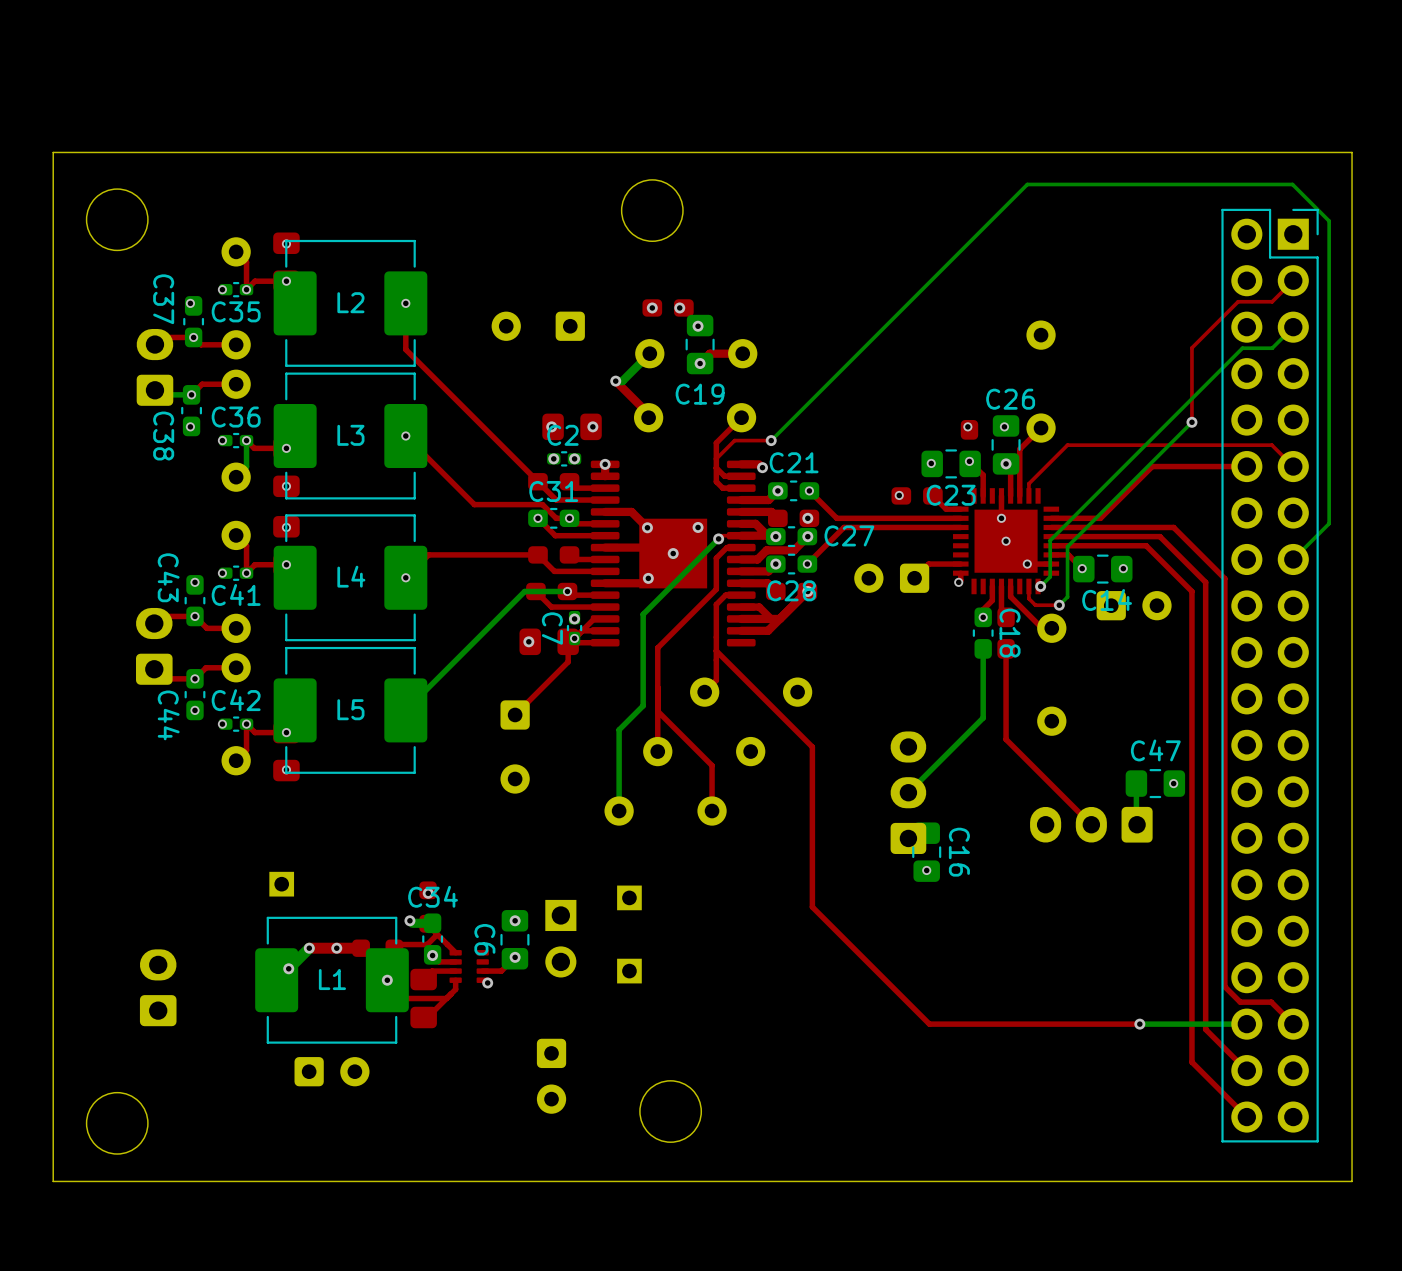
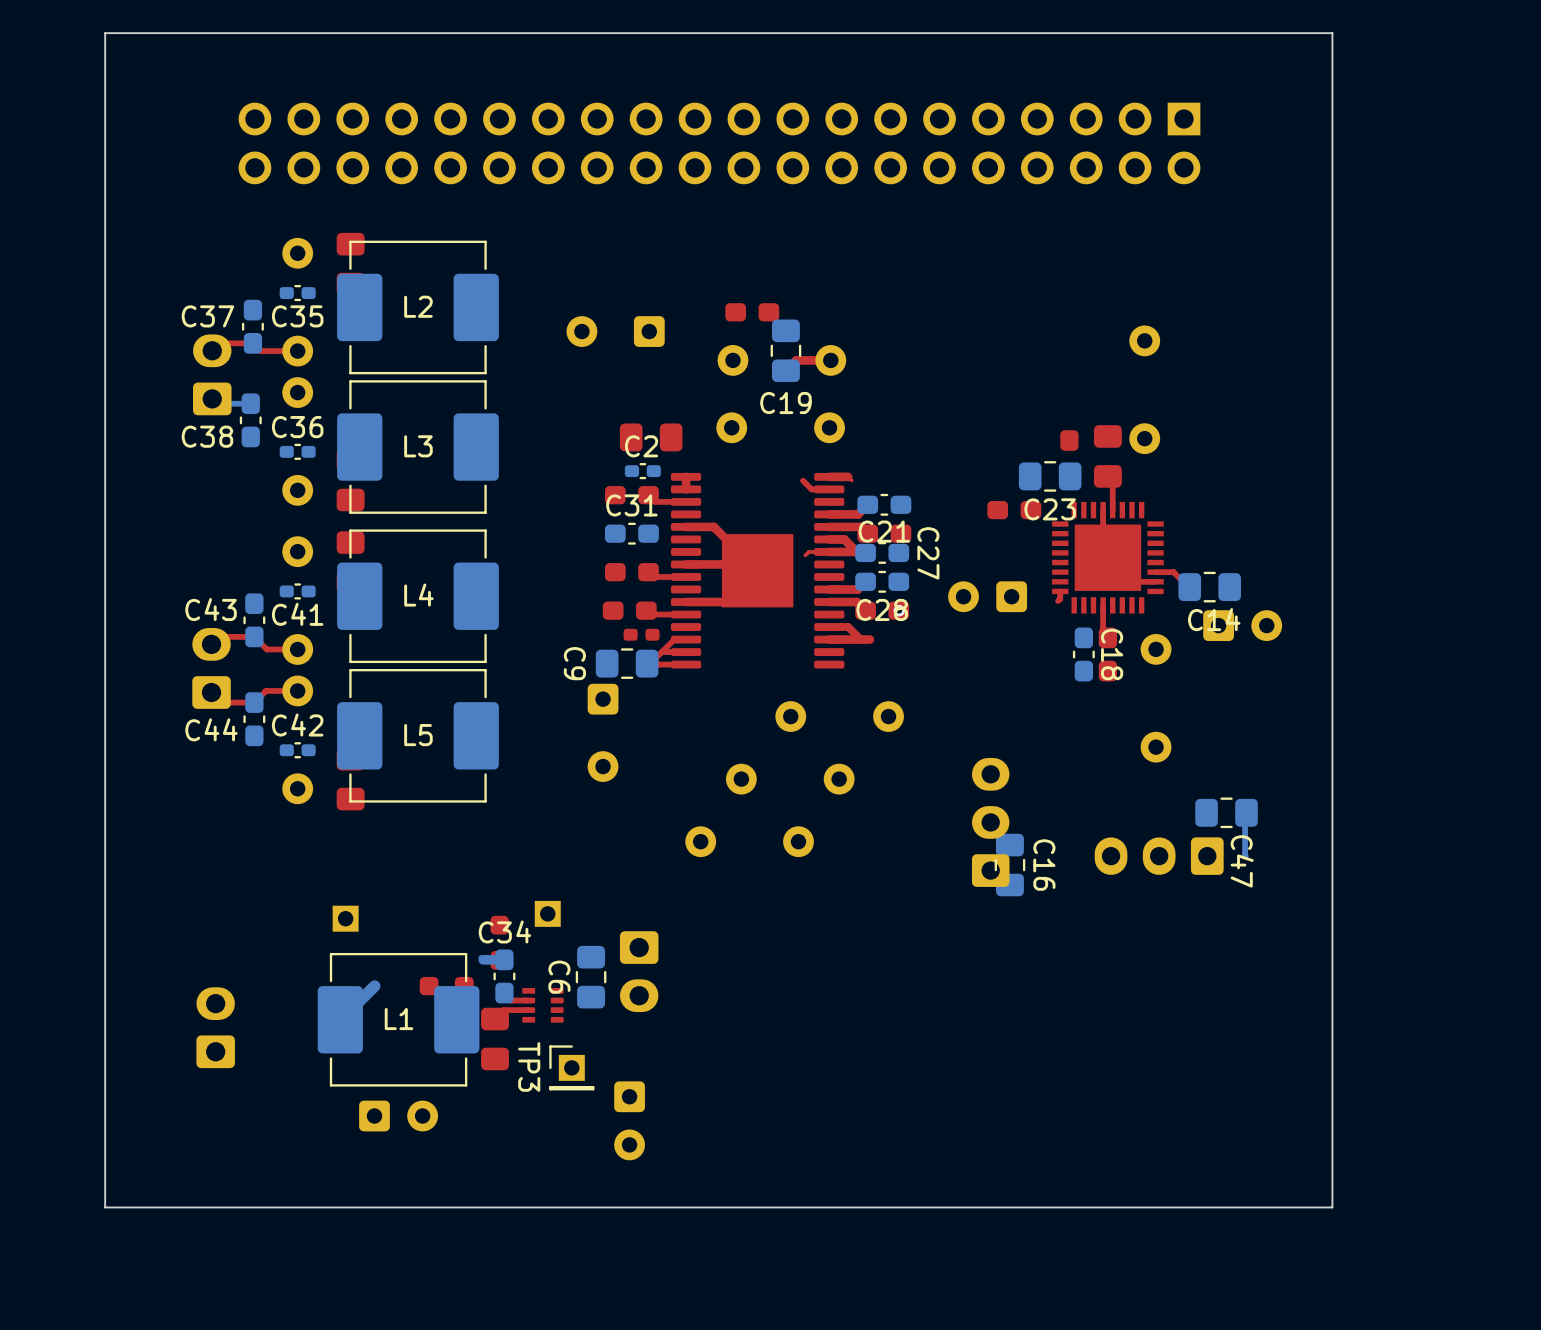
part: none -> (719, 143)
board edge: (53, 152) (1352, 152) (1352, 1181) (53, 1181) (53, 1158) -> (105, 148) (105, 33) (1332, 33) (1332, 1207) (105, 1207)
round board edge: [621, 179, 684, 242] -> none
round board edge: [86, 188, 149, 251] -> none
via: (286, 243) -> none
top track: (236, 251) (246, 262) (246, 289) (254, 281) (286, 281) -> none
top track: (1293, 280) (1272, 301) (1238, 301) (1191, 347) (1191, 422) -> none
via: (286, 281) -> none
via: (222, 289) -> none
via: (246, 289) -> none
C37 name rotation: 0° (163, 299) -> 90° counterclockwise (207, 316)
via: (190, 303) -> none
top track: (405, 303) (405, 349) (556, 500) (605, 500) -> none
via: (405, 303) -> none
via: (652, 307) -> none
via: (679, 307) -> none
via: (698, 326) -> none
bottom track: (1293, 327) (1272, 348) (1242, 348) (1050, 540) (1050, 576) (1040, 586) -> none
via: (193, 337) -> none
bottom track: (649, 353) (622, 381) (615, 381) -> none
via: (700, 363) -> none
top track: (615, 381) (648, 414) (648, 417) -> none
via: (615, 381) -> none
top track: (236, 384) (202, 384) (191, 394) -> none
via: (191, 394) -> none
top track: (741, 417) (716, 442) (716, 481) (722, 488) (741, 488) -> none
bottom track: (1191, 422) (1067, 546) (1067, 597) (1059, 605) -> none
via: (1191, 422) -> none
via: (190, 426) -> none
via: (551, 426) -> none
via: (592, 426) -> none
via: (967, 426) -> none
via: (1004, 426) -> none
top track: (1041, 428) (1019, 449) (1019, 495) -> none
C38 name rotation: 0° (163, 436) -> 90° counterclockwise (207, 436)
top track: (405, 436) (474, 504) (542, 504) (556, 518) (569, 518) (575, 523) (605, 523) -> none
via: (405, 436) -> none
via: (222, 440) -> none
top track: (246, 440) (254, 448) (286, 448) -> none
bottom track: (246, 440) (246, 466) (236, 477) -> none
via: (246, 440) -> none
top track: (771, 440) (734, 440) (716, 458) -> none
bottom track: (771, 440) (1027, 184) (1292, 184) (1329, 221) (1329, 523) (1293, 559) -> none
via: (771, 440) -> none
C26 side: bottom (1006, 444) -> top (1107, 456)
via: (286, 448) -> none
via: (553, 458) -> none
via: (574, 458) -> none
top track: (969, 461) (983, 475) (983, 495) -> none
via: (969, 461) -> none
C21 name position: C21 (794, 462) -> C21 (884, 531)
via: (931, 463) -> none
via: (1006, 463) -> none
via: (605, 464) -> none
top track: (1246, 466) (1152, 466) (1100, 518) (1051, 518) -> none
top track: (1293, 466) (1271, 445) (1067, 445) (1028, 483) (1028, 495) -> none
via: (762, 467) -> none
via: (286, 486) -> none
via: (777, 490) -> none
top track: (809, 490) (836, 518) (960, 518) -> none
via: (809, 490) -> none
via: (899, 495) -> none
top track: (932, 495) (946, 509) (960, 509) -> none
top track: (537, 518) (555, 535) (605, 535) -> none
via: (537, 518) -> none
via: (569, 518) -> none
via: (807, 518) -> none
via: (1001, 518) -> none
via: (286, 527) -> none
via: (647, 527) -> none
via: (698, 527) -> none
top track: (960, 527) (843, 527) (807, 564) -> none
top track: (1051, 527) (1173, 527) (1224, 578) (1224, 986) (1240, 1002) (1271, 1002) (1293, 1024) -> none
top track: (236, 535) (246, 545) (246, 573) (254, 564) (286, 564) -> none
C27 name rotation: 0° (849, 535) -> 90° clockwise (928, 553)
via: (775, 536) -> none
top track: (807, 536) (794, 550) (766, 550) (757, 559) (741, 559) -> none
via: (807, 536) -> none
top track: (1051, 536) (1159, 536) (1205, 582) (1205, 1029) (1246, 1070) -> none
bottom track: (718, 538) (643, 614) (643, 705) (619, 729) (619, 811) -> none
via: (718, 538) -> none
via: (1006, 541) -> none
top track: (1051, 545) (1146, 545) (1191, 591) (1191, 1062) (1246, 1117) -> none
top track: (741, 547) (726, 547) (716, 558) (716, 589) (657, 647) (657, 751) -> none
via: (673, 553) -> none
via: (286, 564) -> none
via: (775, 564) -> none
via: (807, 564) -> none
top track: (960, 564) (928, 564) (914, 578) -> none
via: (1027, 564) -> none
via: (1082, 568) -> none
via: (1123, 568) -> none
top track: (605, 571) (554, 571) (537, 554) (428, 554) (405, 577) -> none
via: (222, 573) -> none
via: (246, 573) -> none
C43 name rotation: 0° (168, 577) -> 90° counterclockwise (211, 609)
via: (405, 577) -> none
via: (648, 578) -> none
via: (194, 582) -> none
via: (958, 582) -> none
top track: (992, 586) (992, 600) (983, 609) (983, 617) -> none
top track: (1010, 586) (1010, 596) (1042, 628) (1051, 628) -> none
top track: (1028, 586) (1028, 598) (1035, 605) (1059, 605) -> none
via: (1040, 586) -> none
top track: (535, 591) (551, 607) (605, 607) -> none
bottom track: (567, 591) (524, 591) (405, 710) -> none
via: (567, 591) -> none
top track: (807, 591) (768, 630) (741, 630) -> none
top track: (741, 595) (725, 595) (716, 604) (716, 680) (704, 692) -> none
via: (1059, 605) -> none
via: (194, 616) -> none
via: (983, 617) -> none
via: (574, 618) -> none
C7 side: bottom (574, 628) -> top (641, 634)
via: (574, 638) -> none
via: (528, 641) -> none
C9 side: top (549, 641) -> bottom (627, 663)
top track: (568, 641) (568, 661) (515, 714) -> none
bottom track: (983, 648) (983, 717) (908, 792) -> none
top track: (1006, 648) (1006, 739) (1091, 824) -> none
top track: (716, 650) (812, 746) (812, 907) (929, 1024) (1139, 1024) -> none
part: (1270, 675) -> none
via: (194, 678) -> none
via: (194, 710) -> none
top track: (657, 711) (712, 765) (712, 811) -> none
C44 name rotation: 0° (168, 715) -> 90° counterclockwise (211, 729)
via: (222, 724) -> none
via: (246, 724) -> none
top track: (286, 732) (254, 732) (246, 724) (246, 750) (236, 760) -> none
via: (286, 732) -> none
part position: (515, 746) -> (603, 732)
C47 name rotation: 0° (1155, 750) -> 90° clockwise (1242, 861)
C47 name position: C47 (1155, 750) -> C47 (1242, 861)
via: (286, 769) -> none
C47 position: (1155, 783) -> (1226, 812)
via: (1173, 783) -> none
part position: (908, 792) -> (990, 822)
part position: (1091, 824) -> (1159, 856)
C16 position: (926, 852) -> (1009, 865)
via: (926, 870) -> none
via: (428, 893) -> none
part position: (629, 897) -> (547, 913)
part footprint: [545, 899, 577, 978] -> [619, 931, 659, 1013]
via: (409, 920) -> none
via: (515, 920) -> none
top track: (428, 923) (455, 952) -> none
top track: (437, 934) (427, 944) (398, 944) (394, 948) -> none
via: (309, 948) -> none
via: (336, 948) -> none
top track: (361, 948) (309, 948) -> none
via: (432, 955) -> none
top track: (515, 957) (501, 971) (482, 971) -> none
via: (515, 957) -> none
via: (288, 968) -> none
TP3 side: top (629, 971) -> bottom (571, 1067)
top track: (387, 980) (405, 998) (446, 998) -> none
via: (387, 980) -> none
top track: (455, 980) (455, 989) (427, 1017) -> none
via: (487, 982) -> none
via: (1139, 1024) -> none
bottom track: (1246, 1024) (1139, 1024) -> none
round board edge: [639, 1080, 702, 1143] -> none
round board edge: [86, 1092, 149, 1155] -> none

